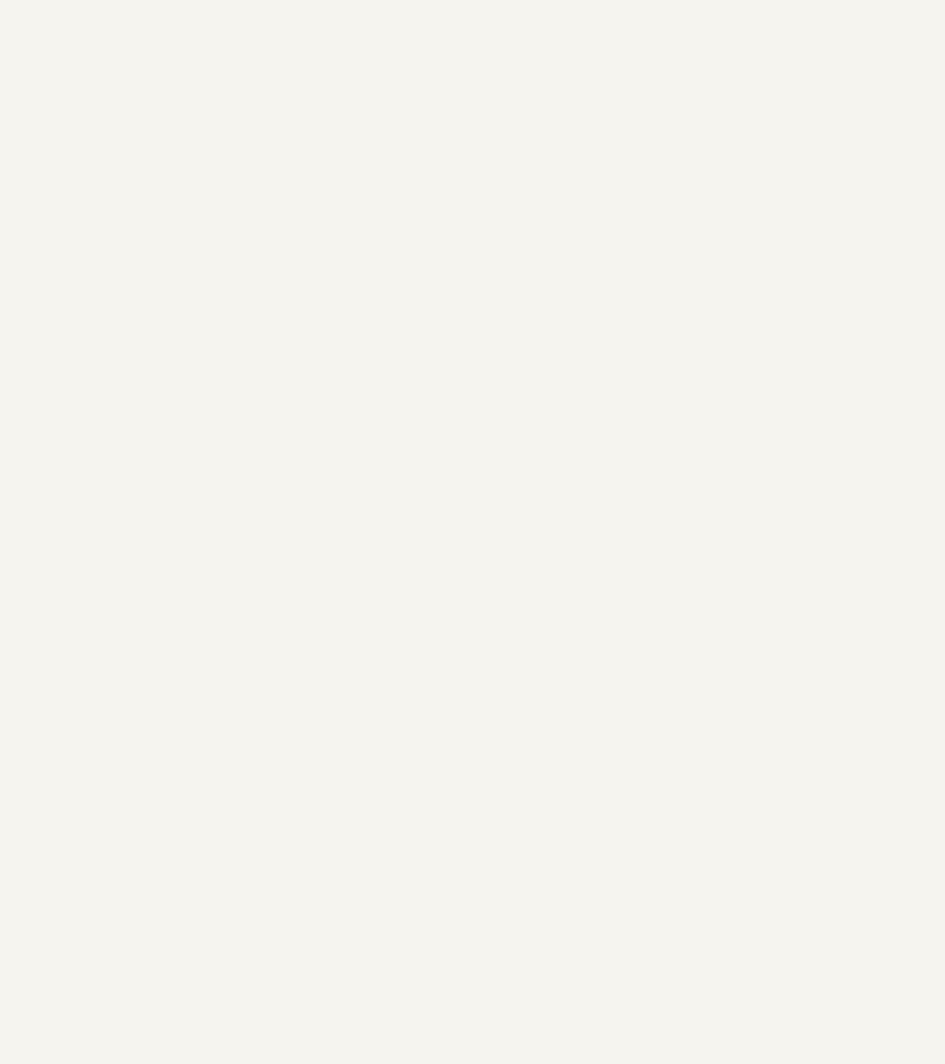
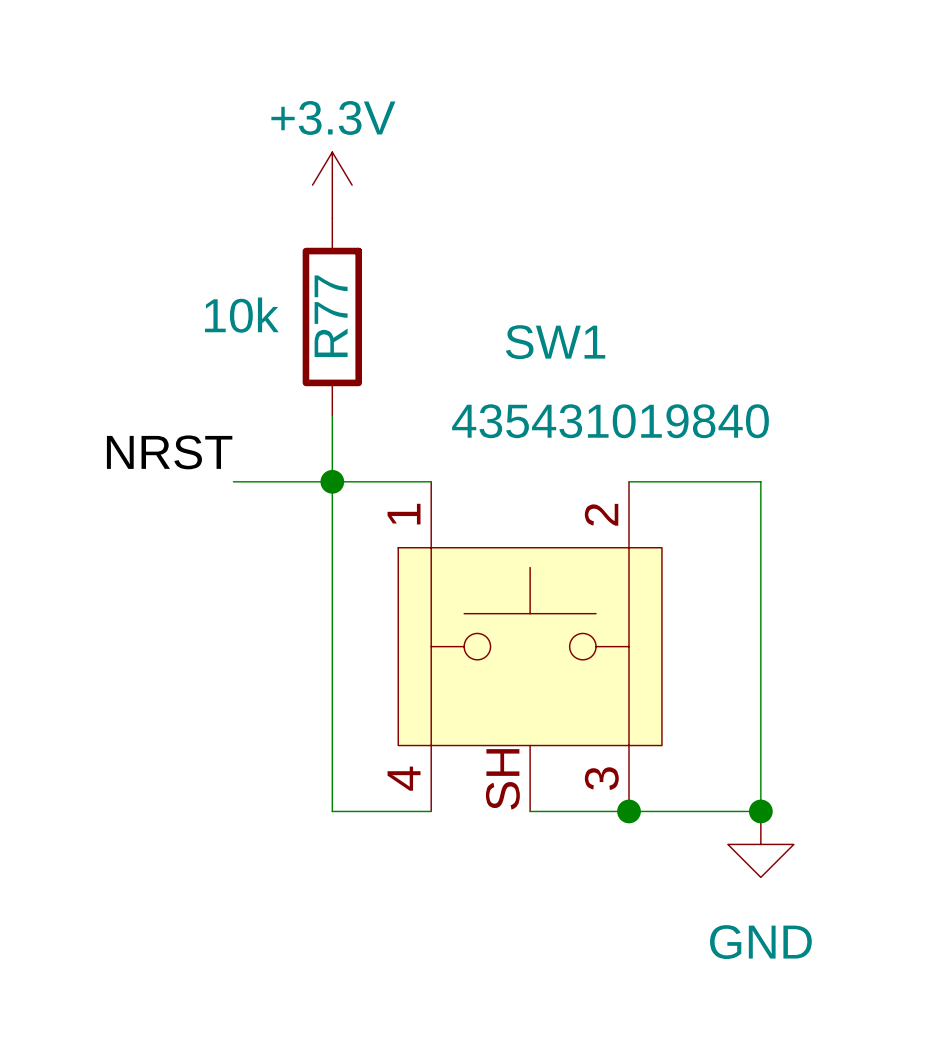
power symbol: none -> +3.3V (332, 185)
R77: none -> 10k (332, 316)
wire: none -> (332, 415) (332, 811) (431, 811)
label: none -> NRST (169, 452)
wire: none -> (233, 481) (431, 481)
junction: none -> (332, 481)
wire: none -> (629, 481) (760, 481) (760, 811) (530, 811)
SW1: none -> 435431019840 (530, 646)
junction: none -> (629, 811)
junction: none -> (760, 811)
power symbol: none -> GND (760, 844)

